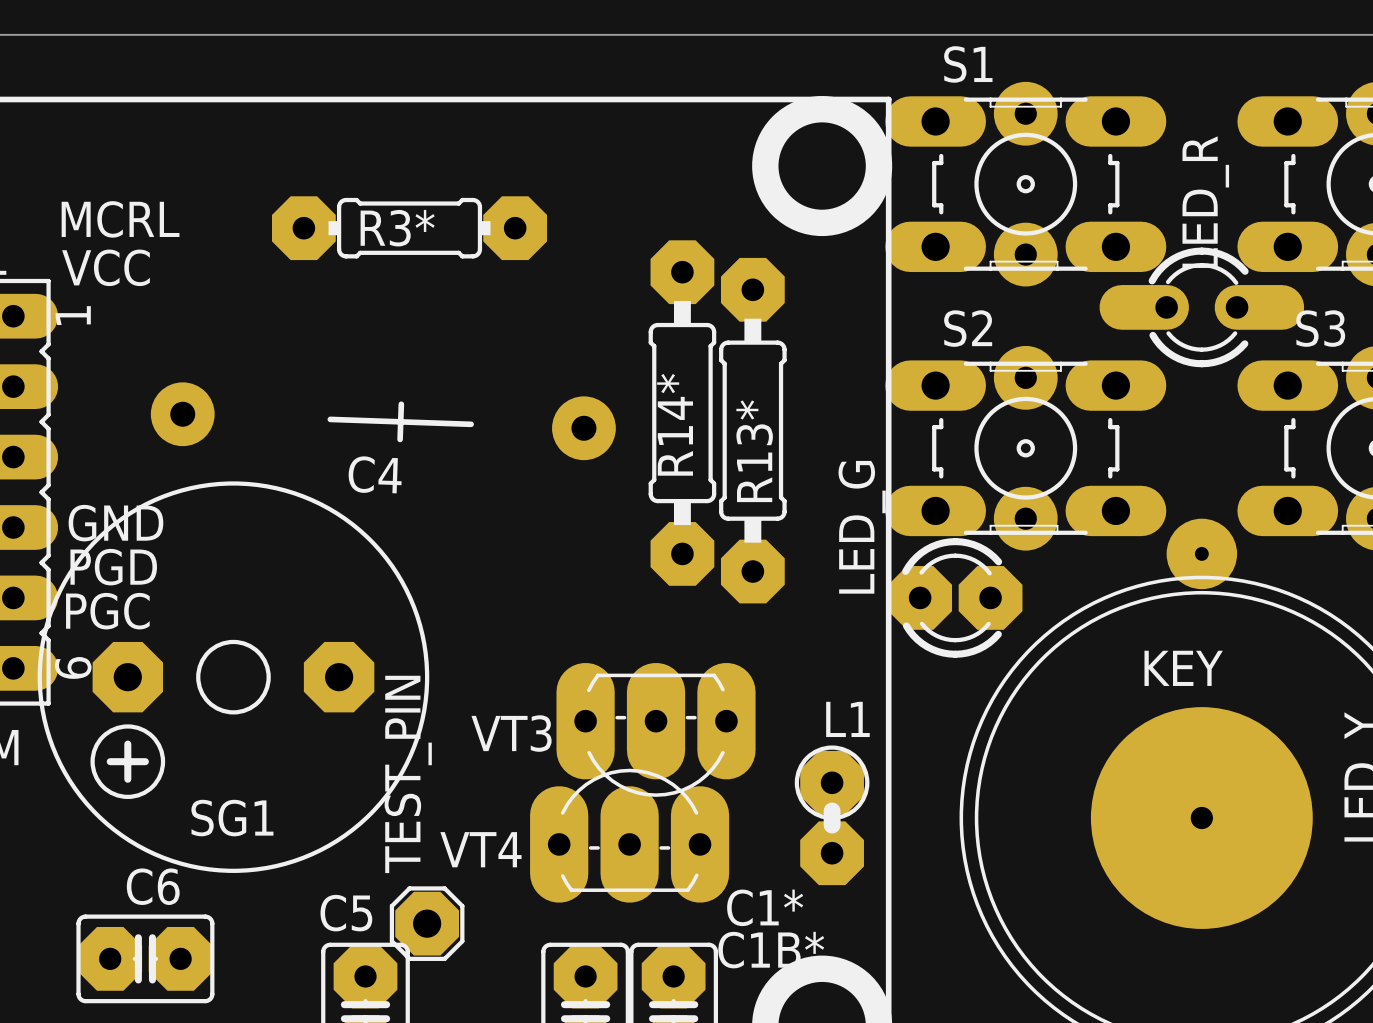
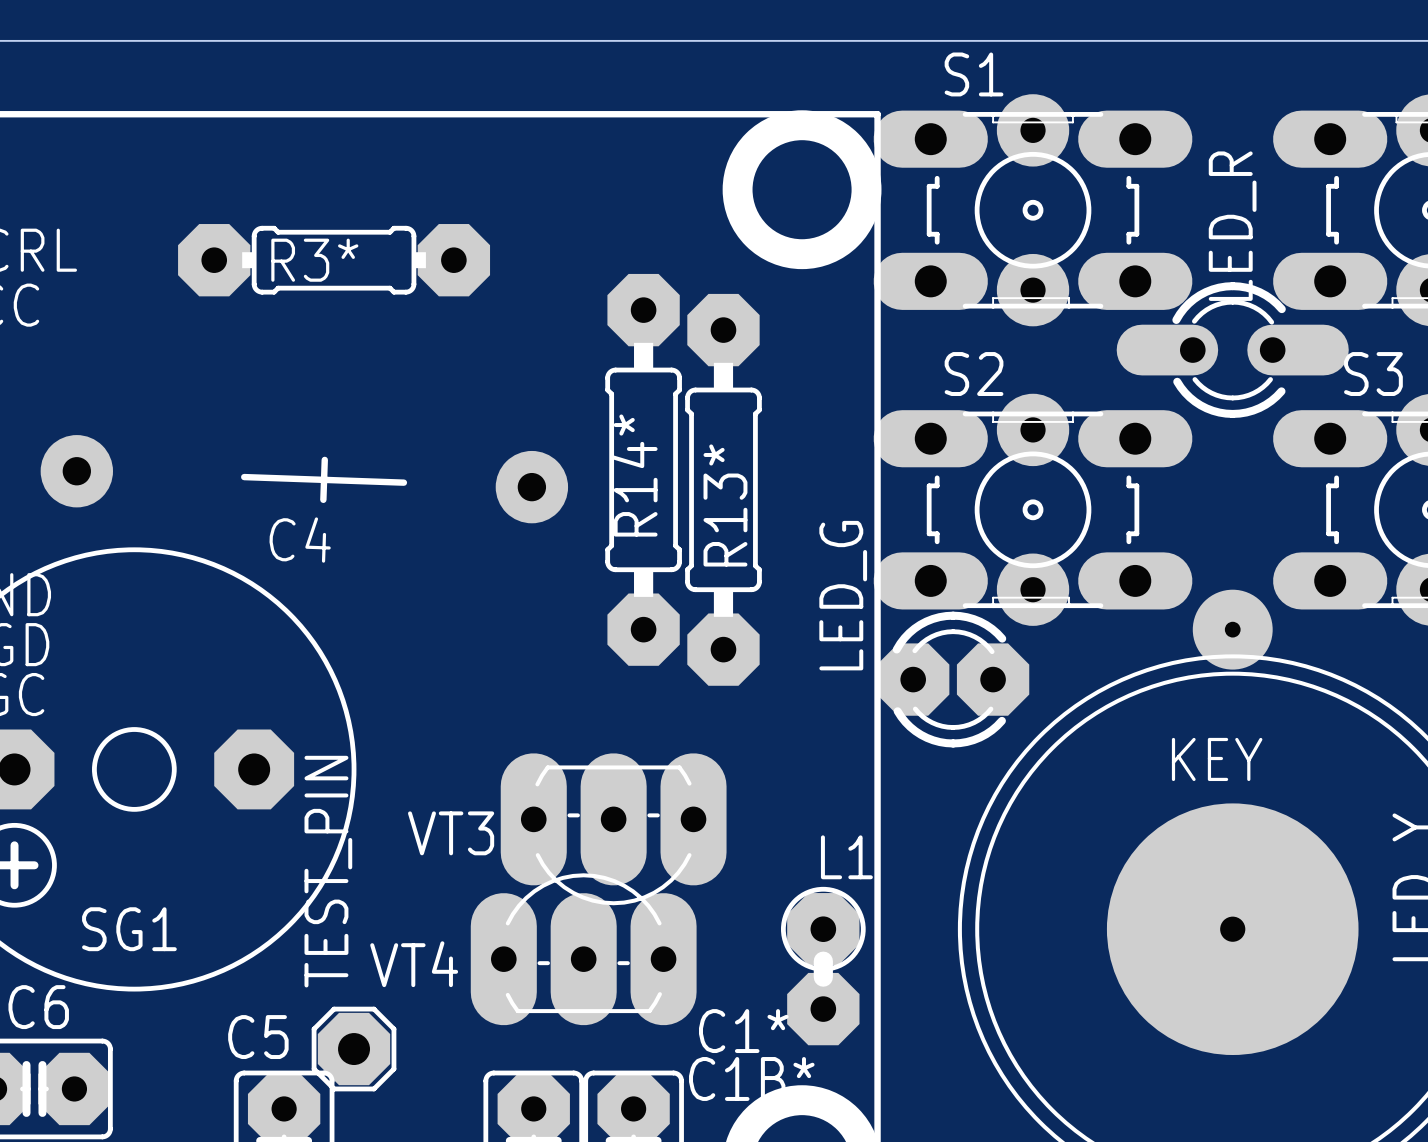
L1 position: (832, 815) -> (823, 966)

